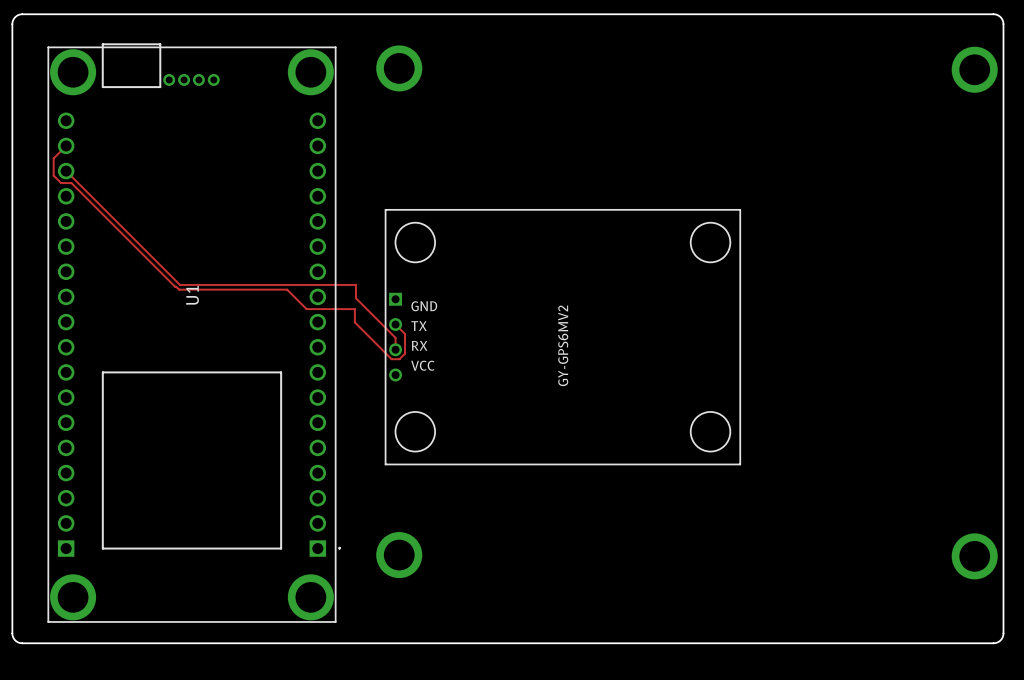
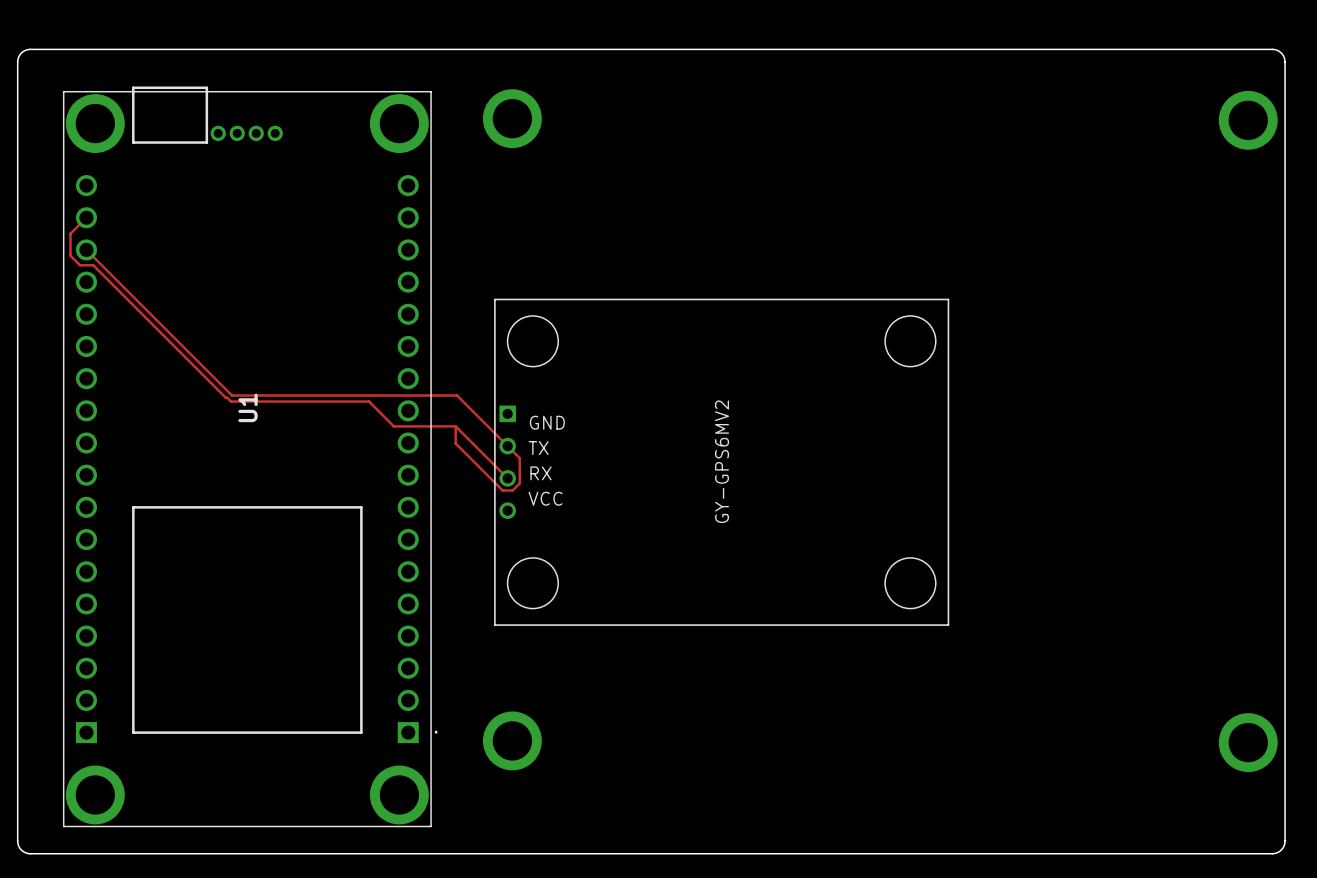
track: (355, 284) (355, 298) (395, 337) (395, 349) -> (455, 426) (507, 478)

